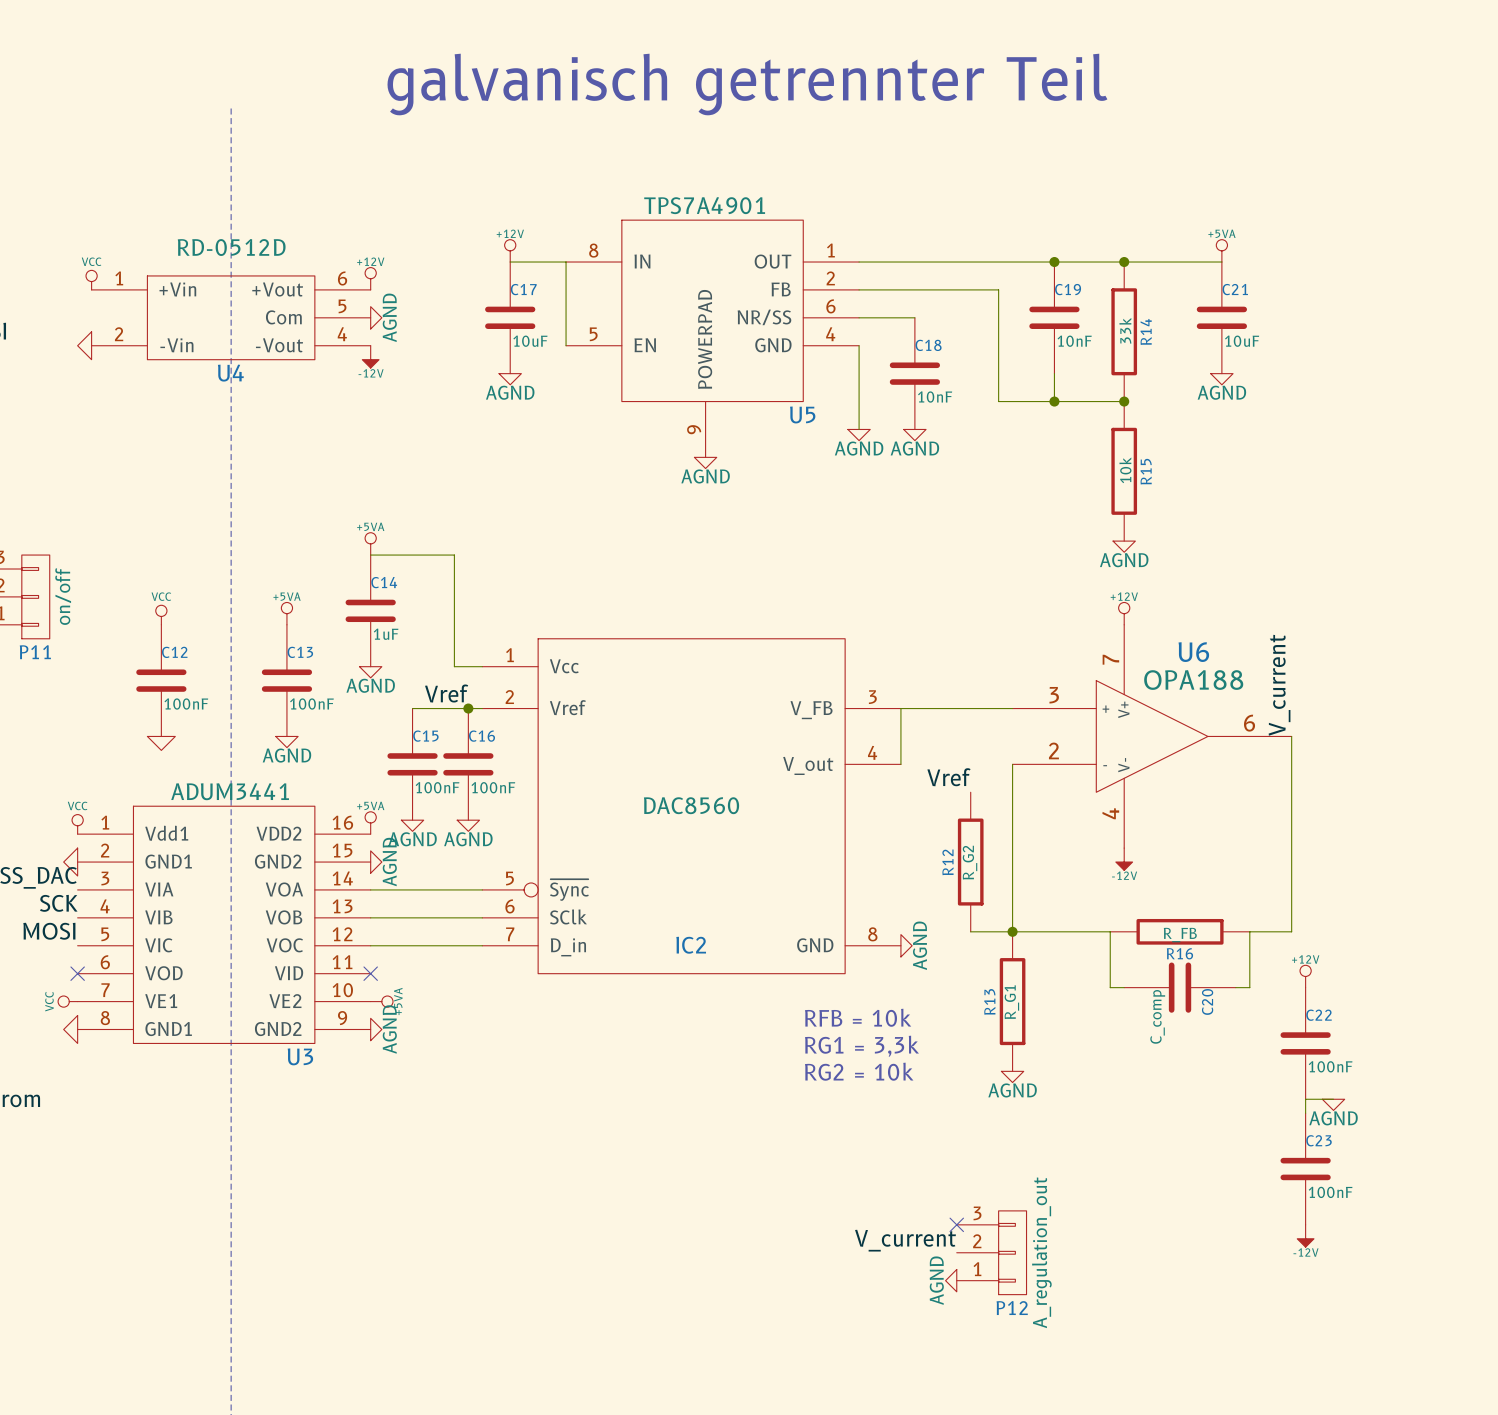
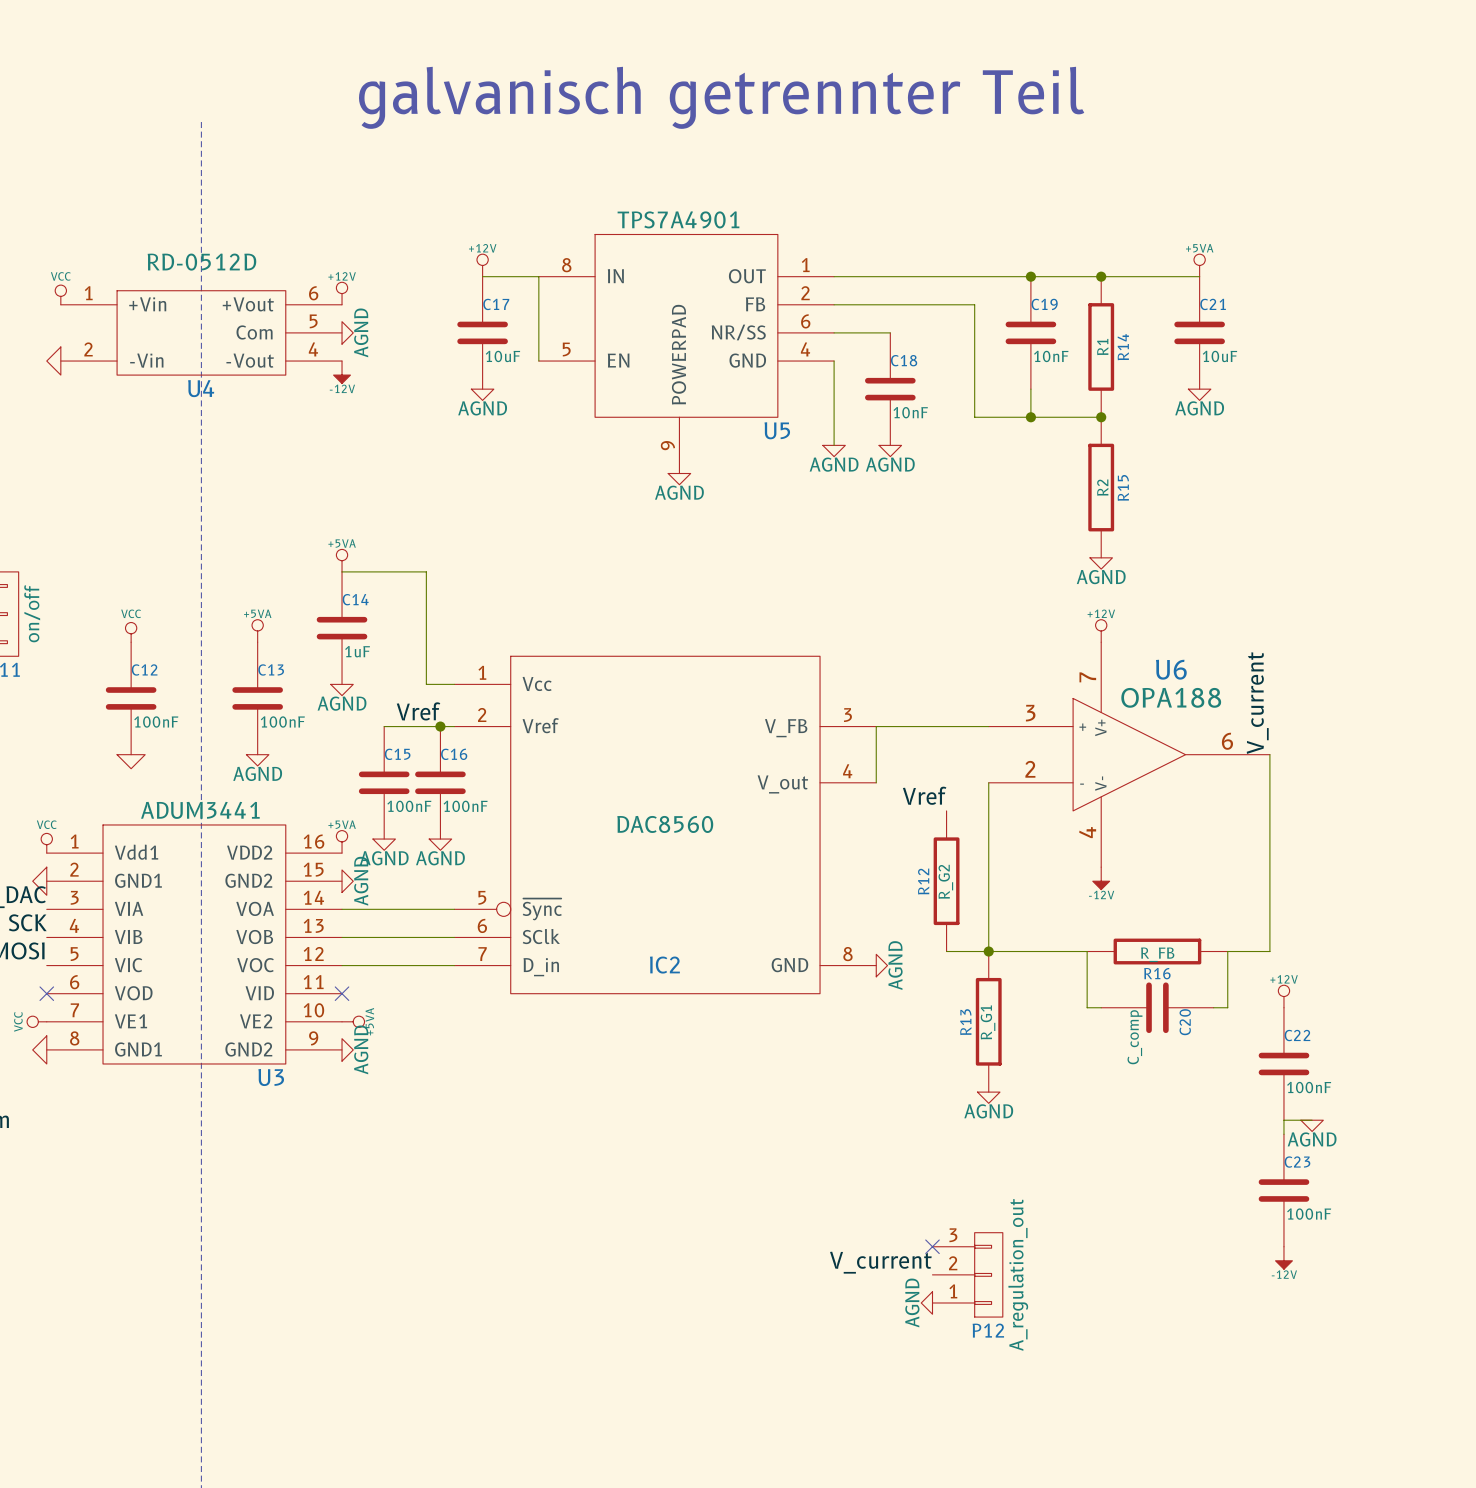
R14 value: 33k (1125, 330) -> R1 (1102, 347)
R15 value: 10k (1125, 470) -> R2 (1102, 487)
text: RFB = 10k (858, 1017) -> none
text: RG1 = 3,3k (861, 1046) -> none
text: RG2 = 10k (859, 1071) -> none

